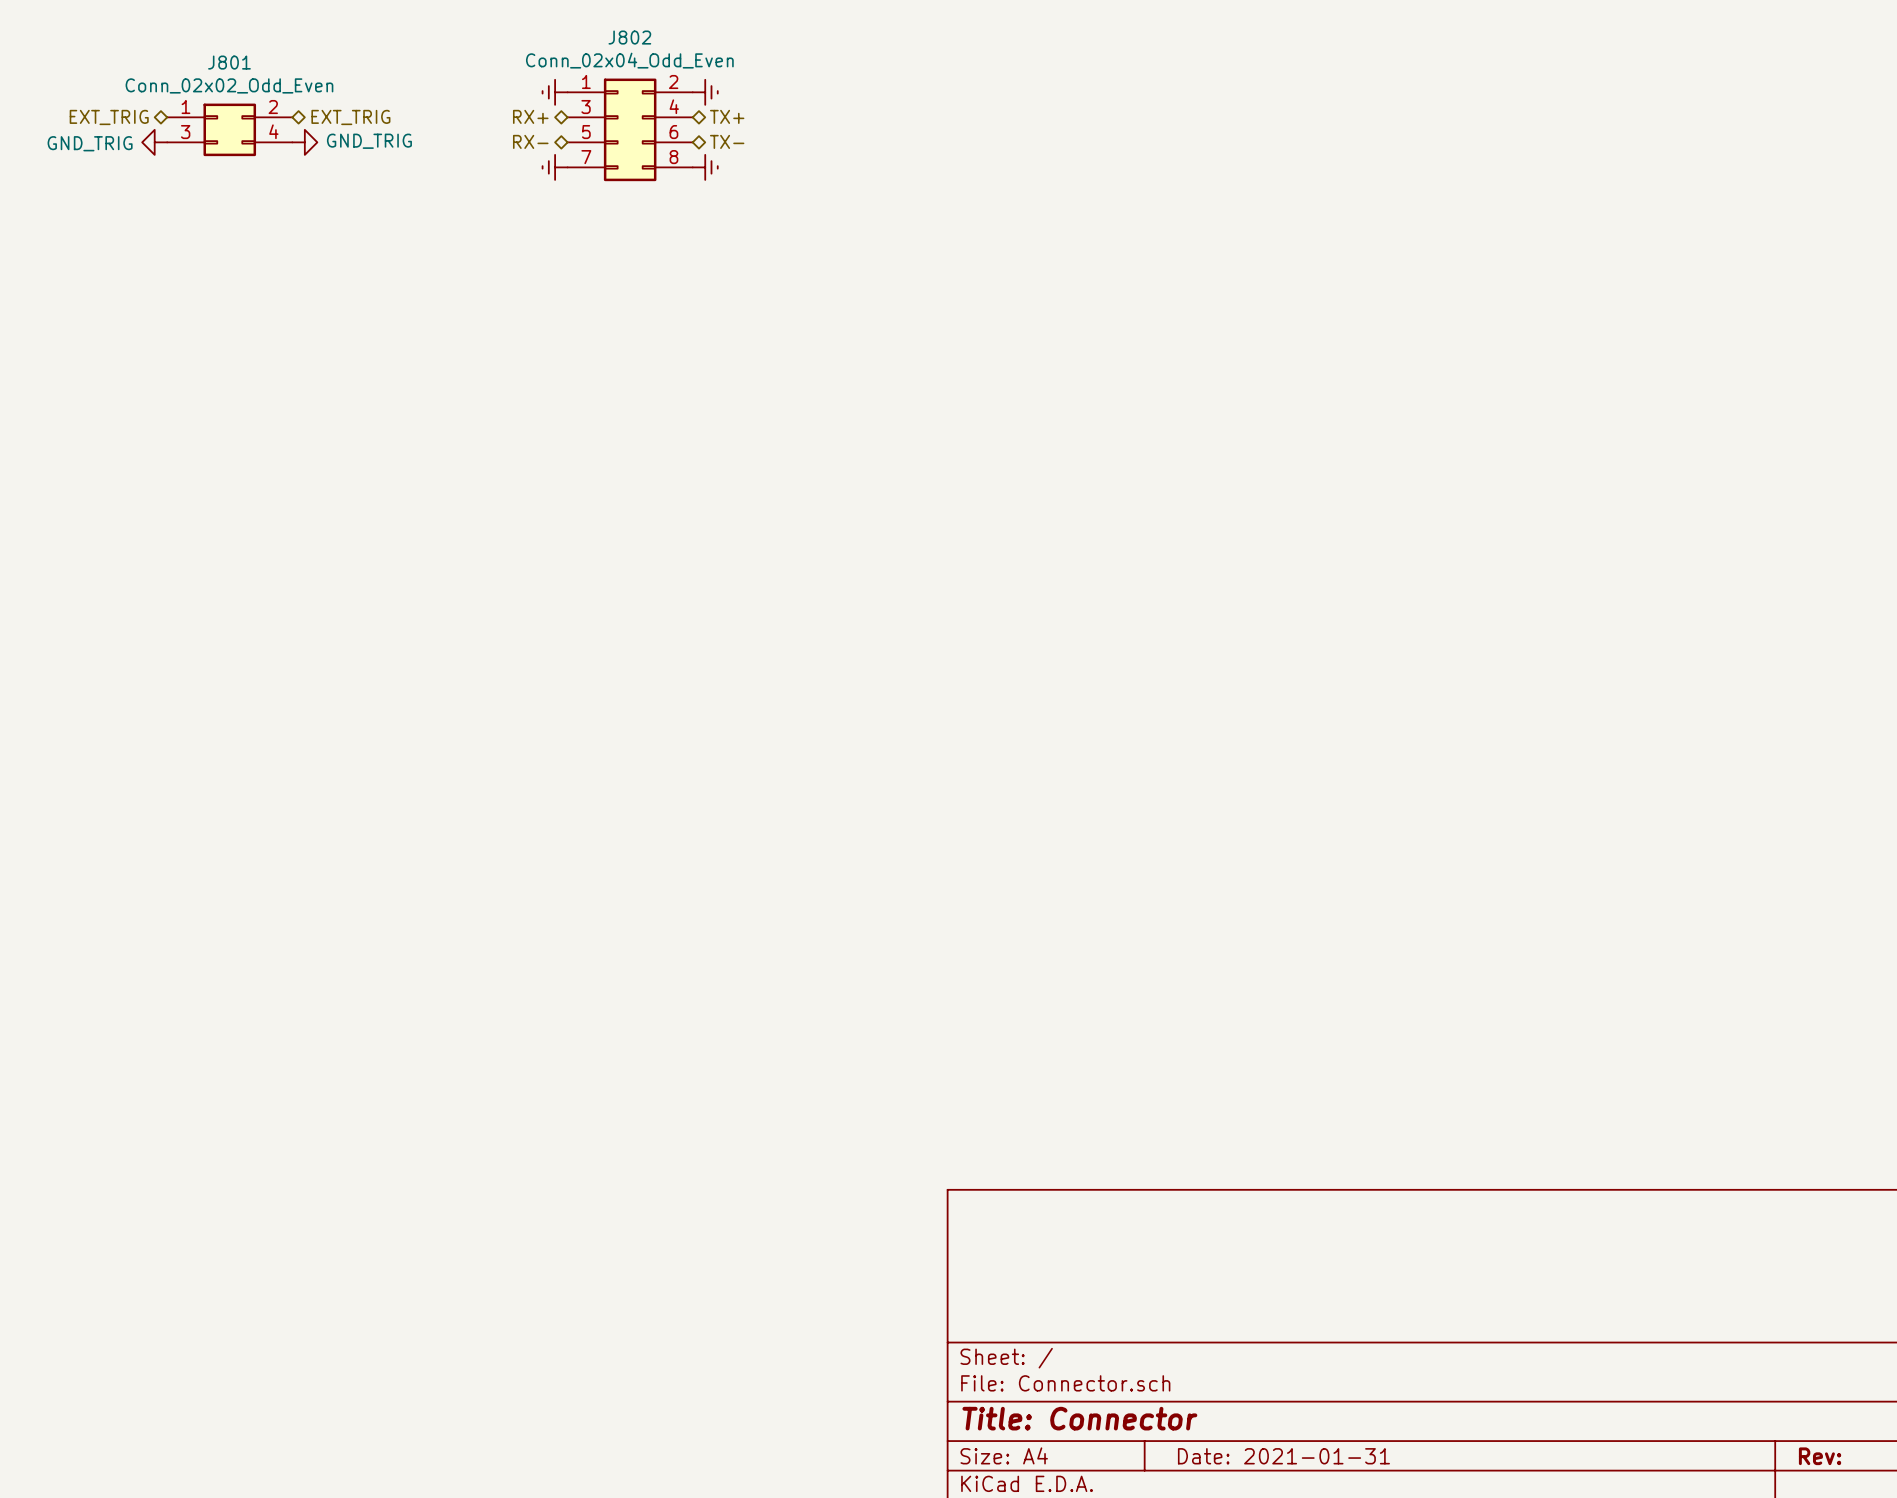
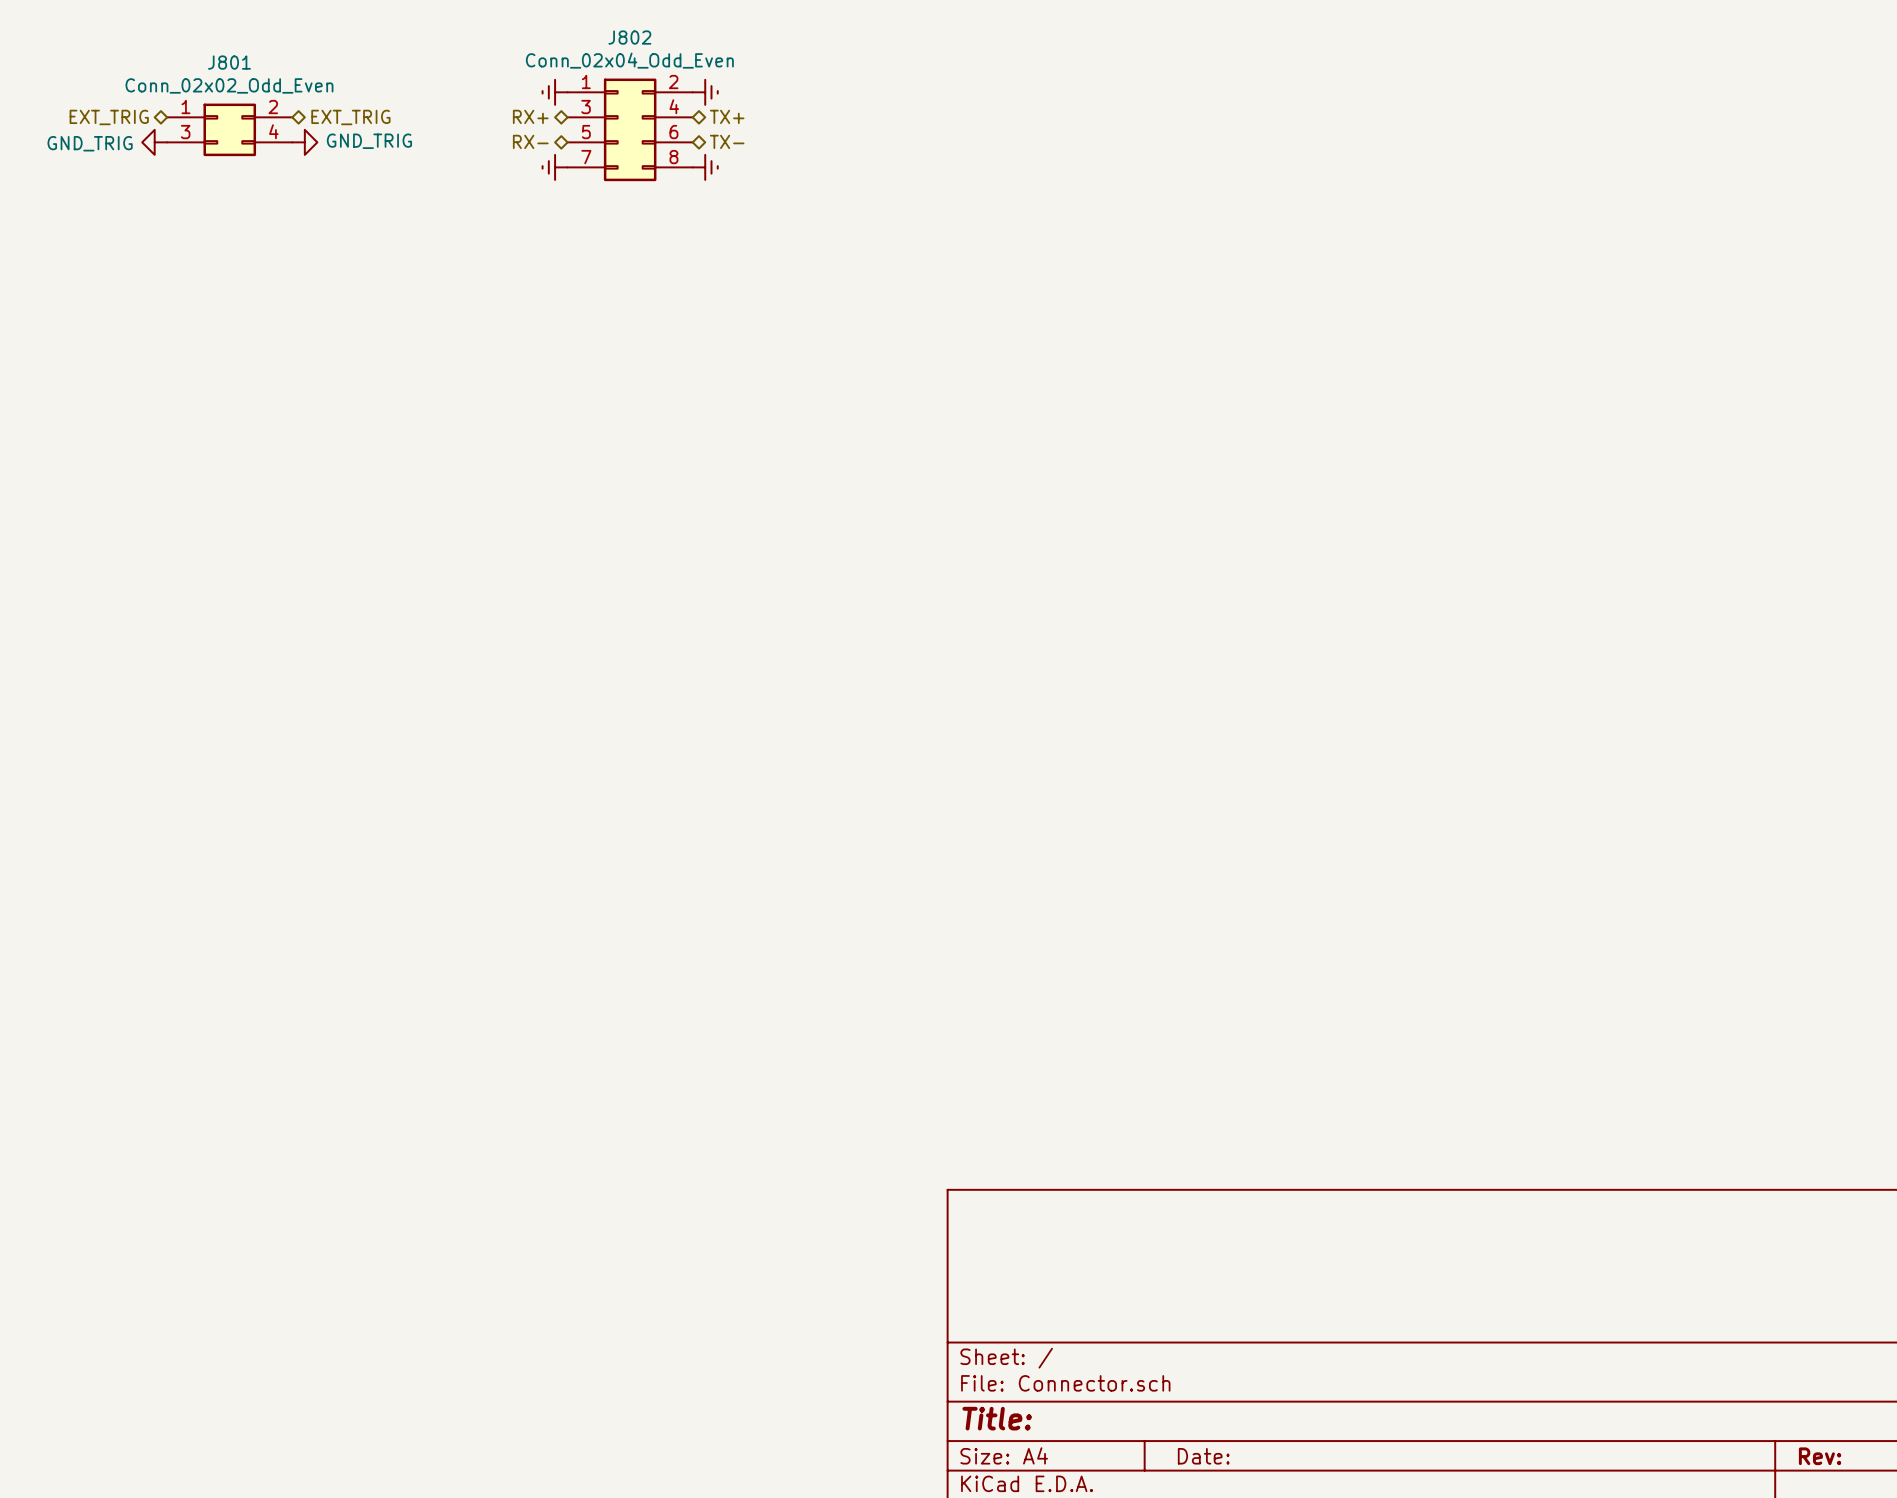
title block: Title: Connector (1079, 1418) -> Title: (997, 1418)
title block: Date: 2021-01-31 (1283, 1456) -> Date: (1203, 1456)

